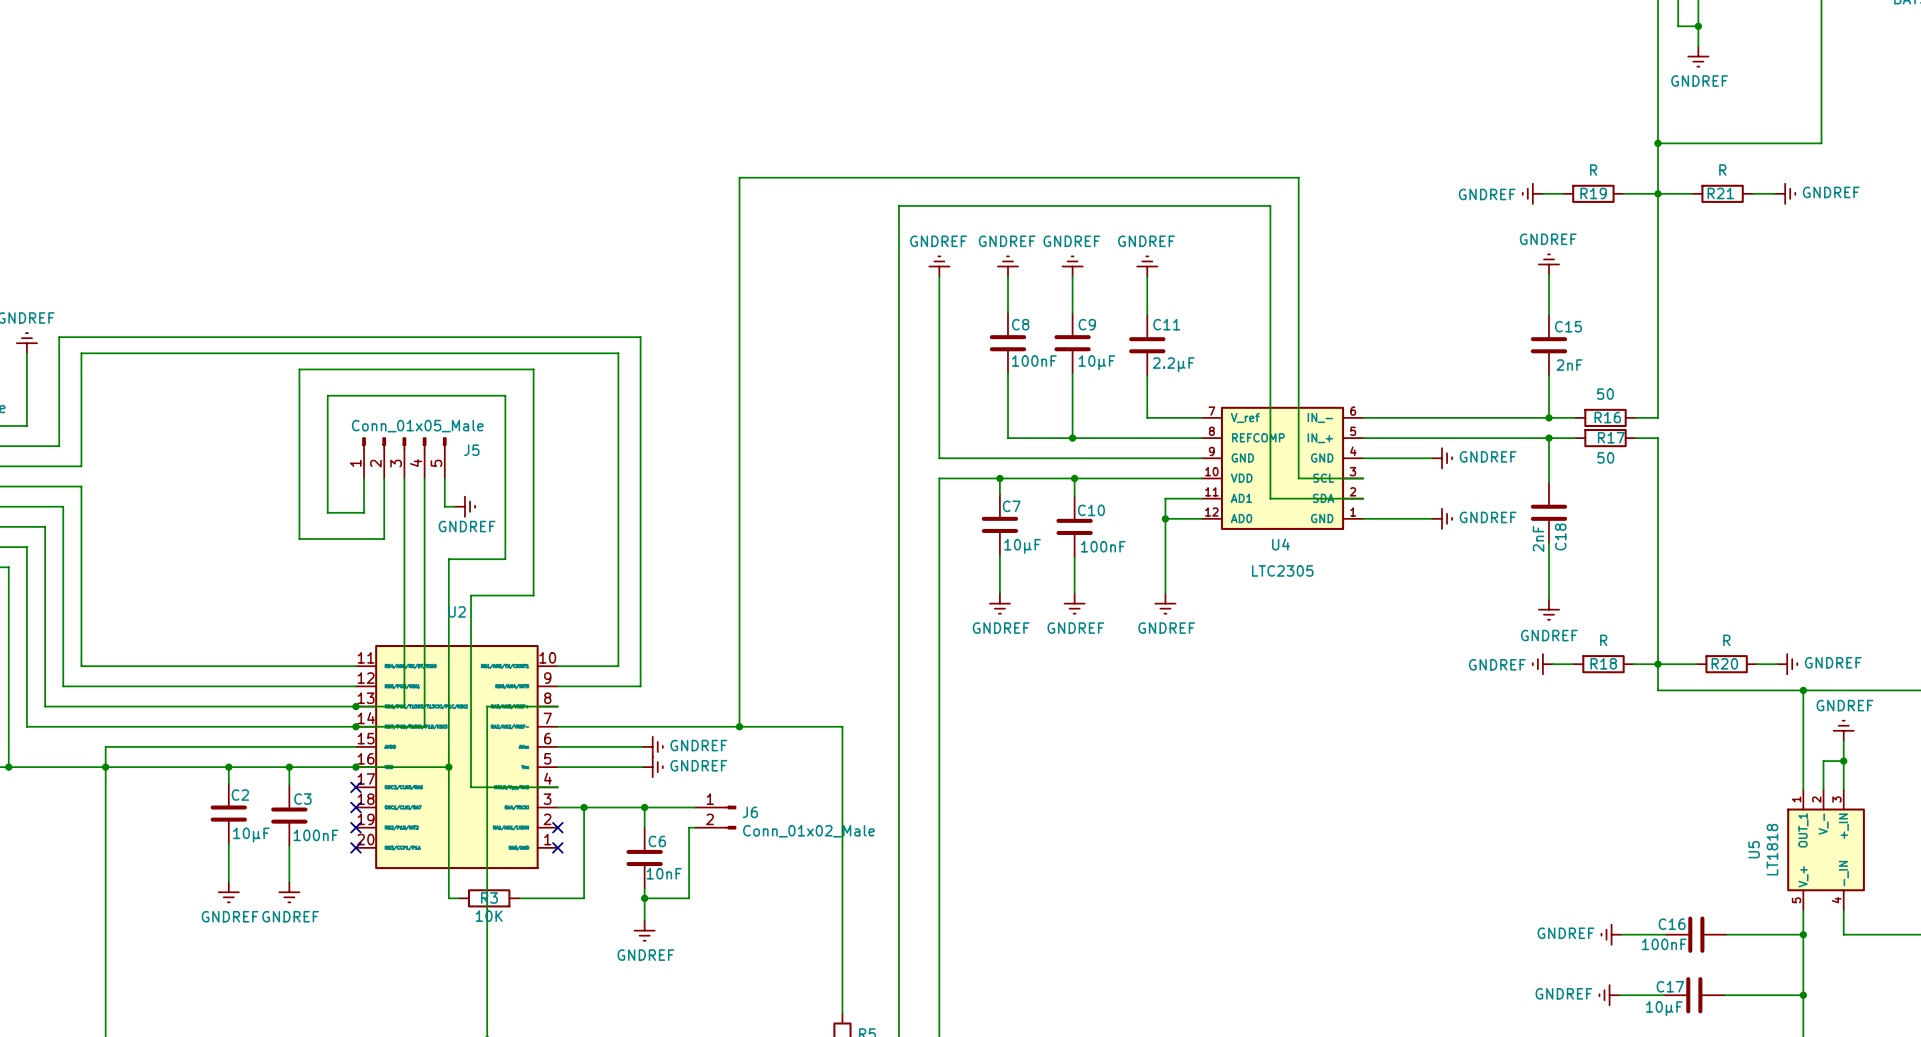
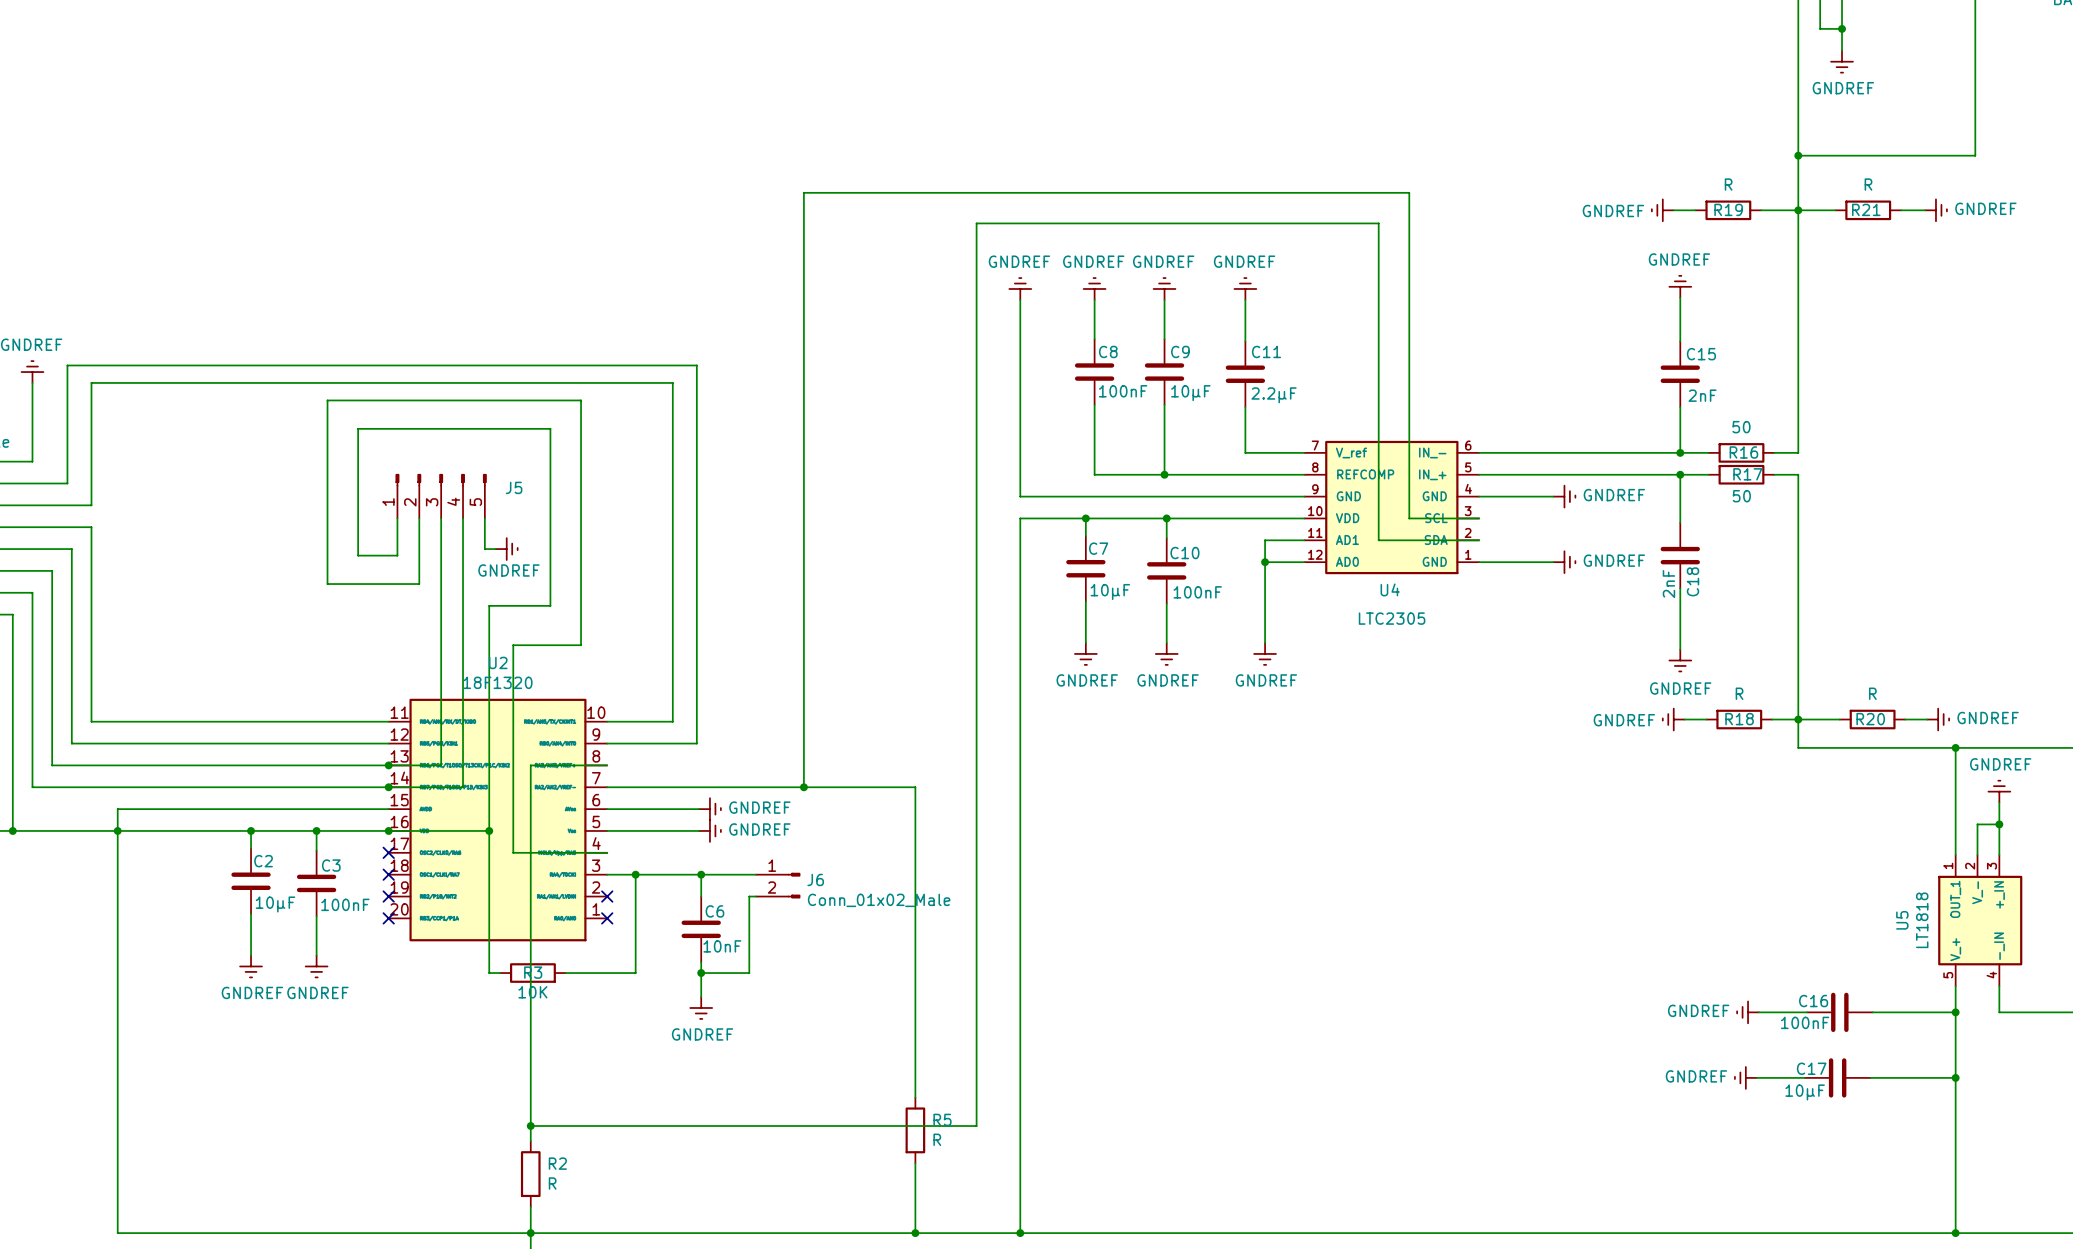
J5 value: Conn_01x05_Male (417, 426) -> none
U2 value: none -> 18F1320 (497, 682)

